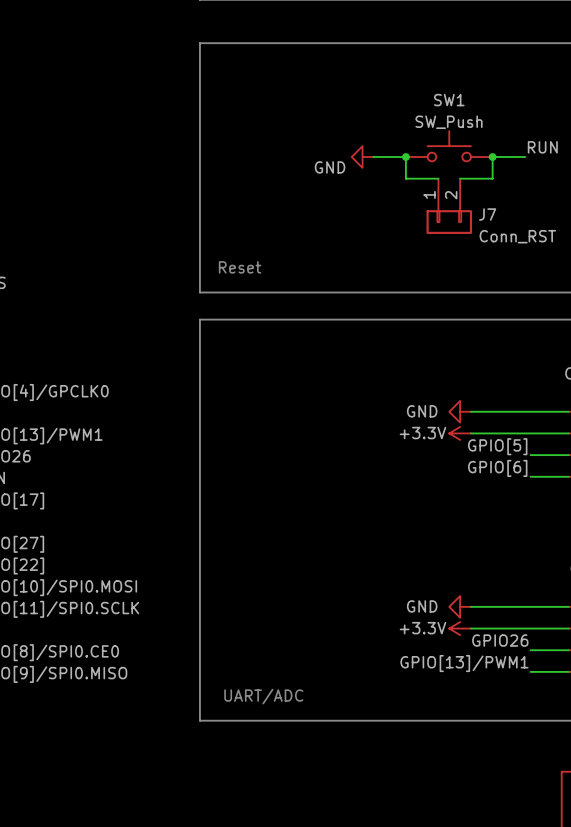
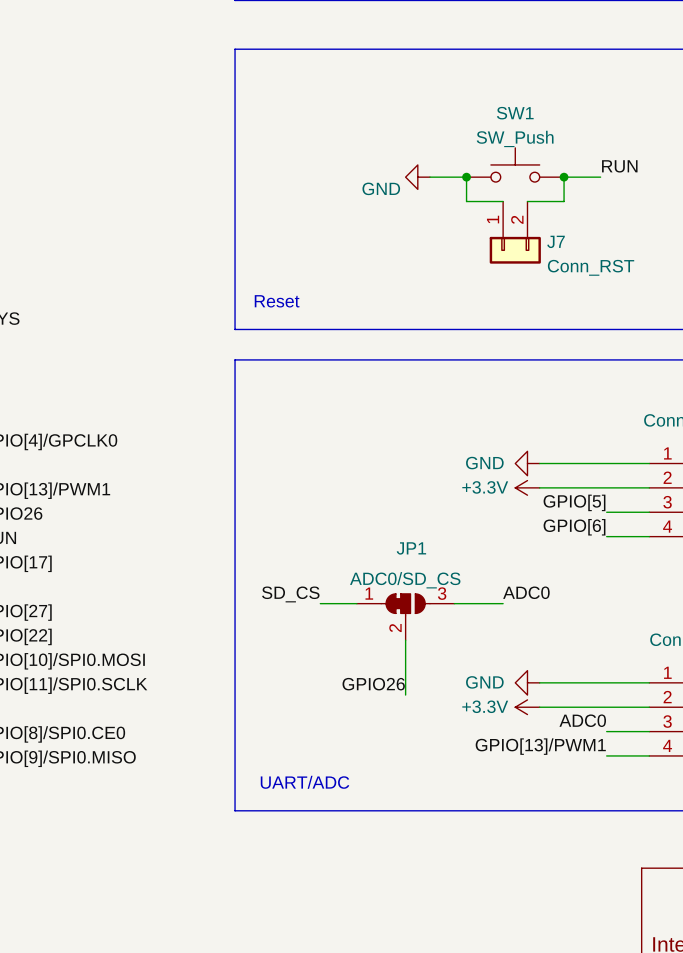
label: none -> ADC0 (526, 592)
label: none -> SD_CS (290, 594)
wire: none -> (320, 603) (356, 603)
wire: none -> (454, 603) (503, 603)
JP1: none -> ADC0/SD_CS (405, 617)
wire: none -> (405, 640) (405, 695)
label: none -> GPIO26 (373, 684)
label: GPIO26 (500, 640) -> ADC0 (582, 720)

